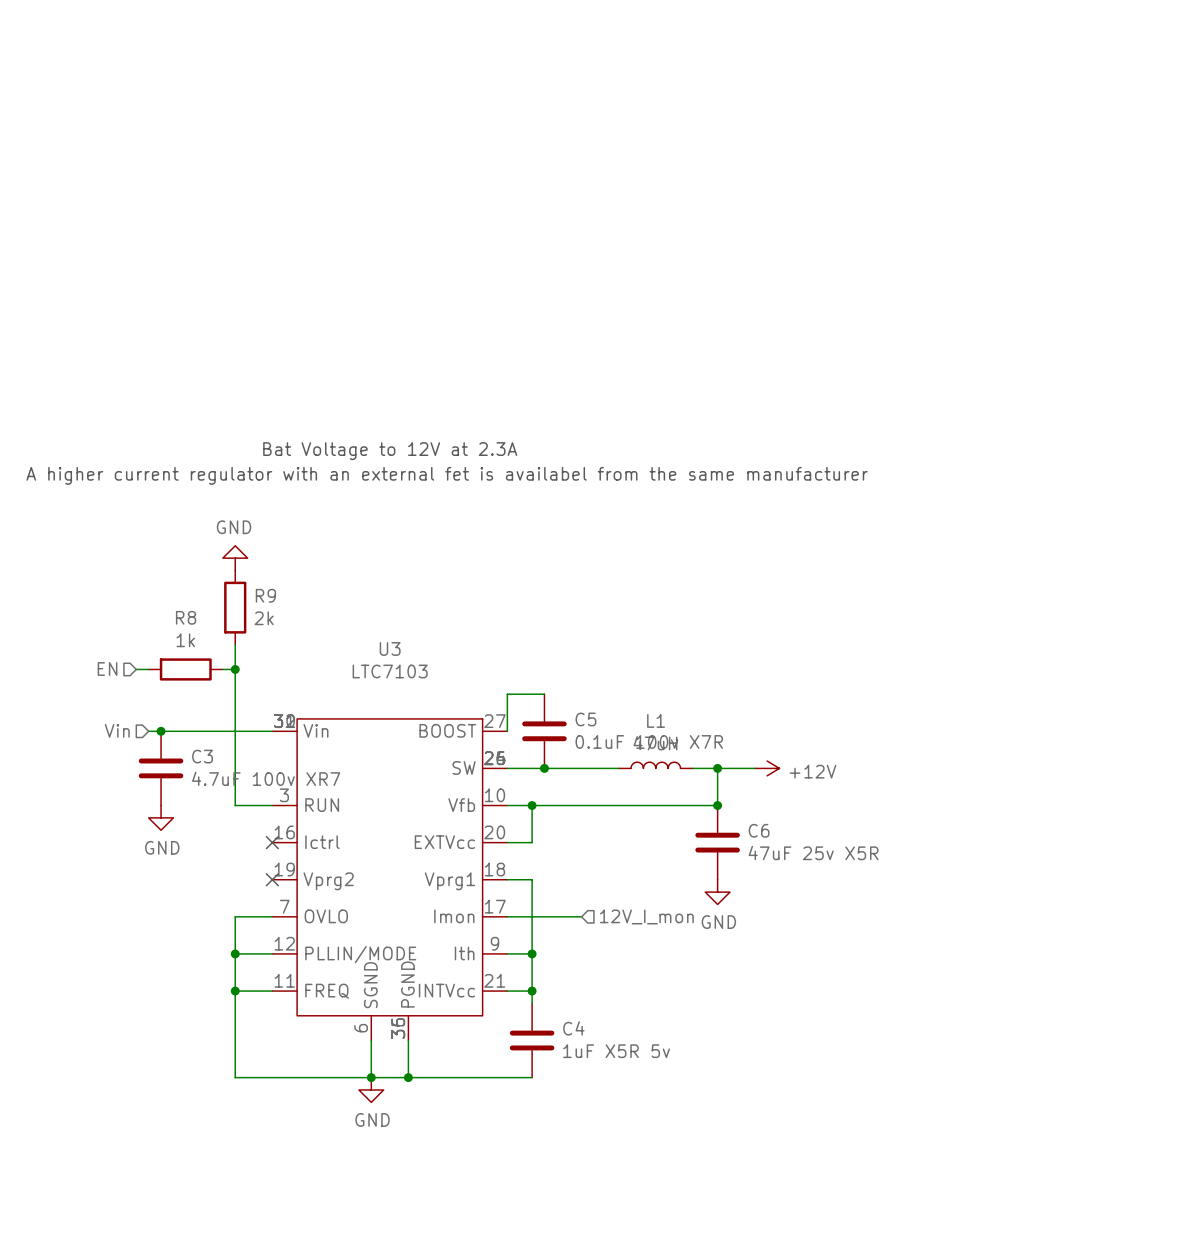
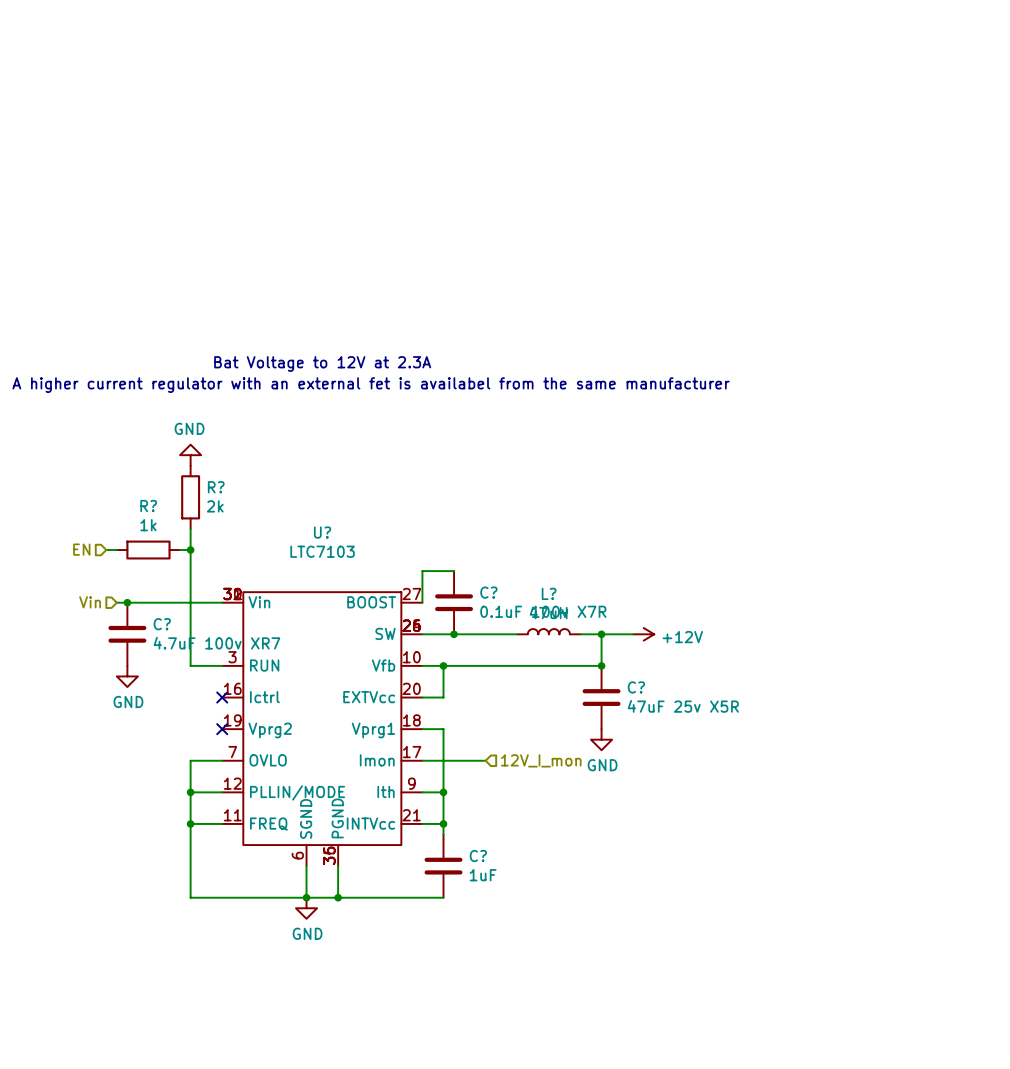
R9 name: R9 (265, 595) -> R? (216, 487)
R8 name: R8 (186, 617) -> R? (148, 506)
U3 name: U3 (390, 648) -> U? (322, 532)
C5 name: C5 (585, 719) -> C? (488, 592)
L1 name: L1 (656, 720) -> L? (549, 593)
C3 name: C3 (202, 756) -> C? (162, 624)
C6 name: C6 (759, 830) -> C? (636, 687)
C4 name: C4 (573, 1028) -> C? (478, 856)
C4 value: 1uF X5R 5v (616, 1051) -> 1uF (483, 875)

